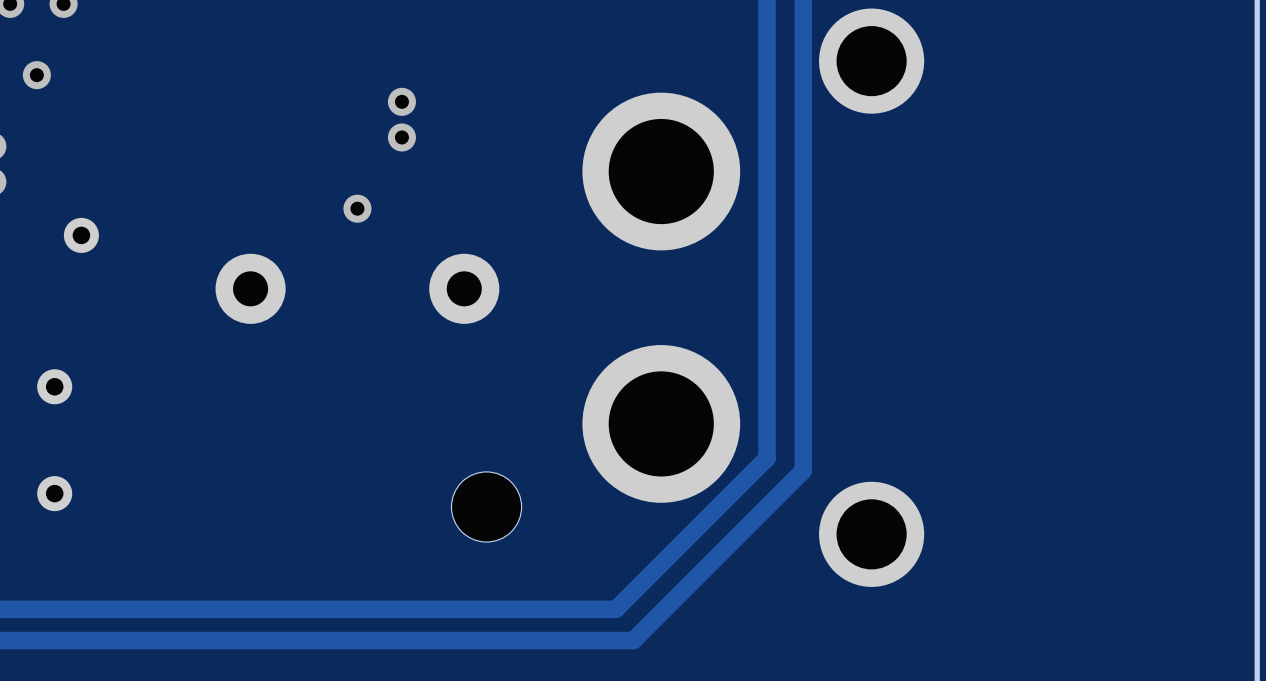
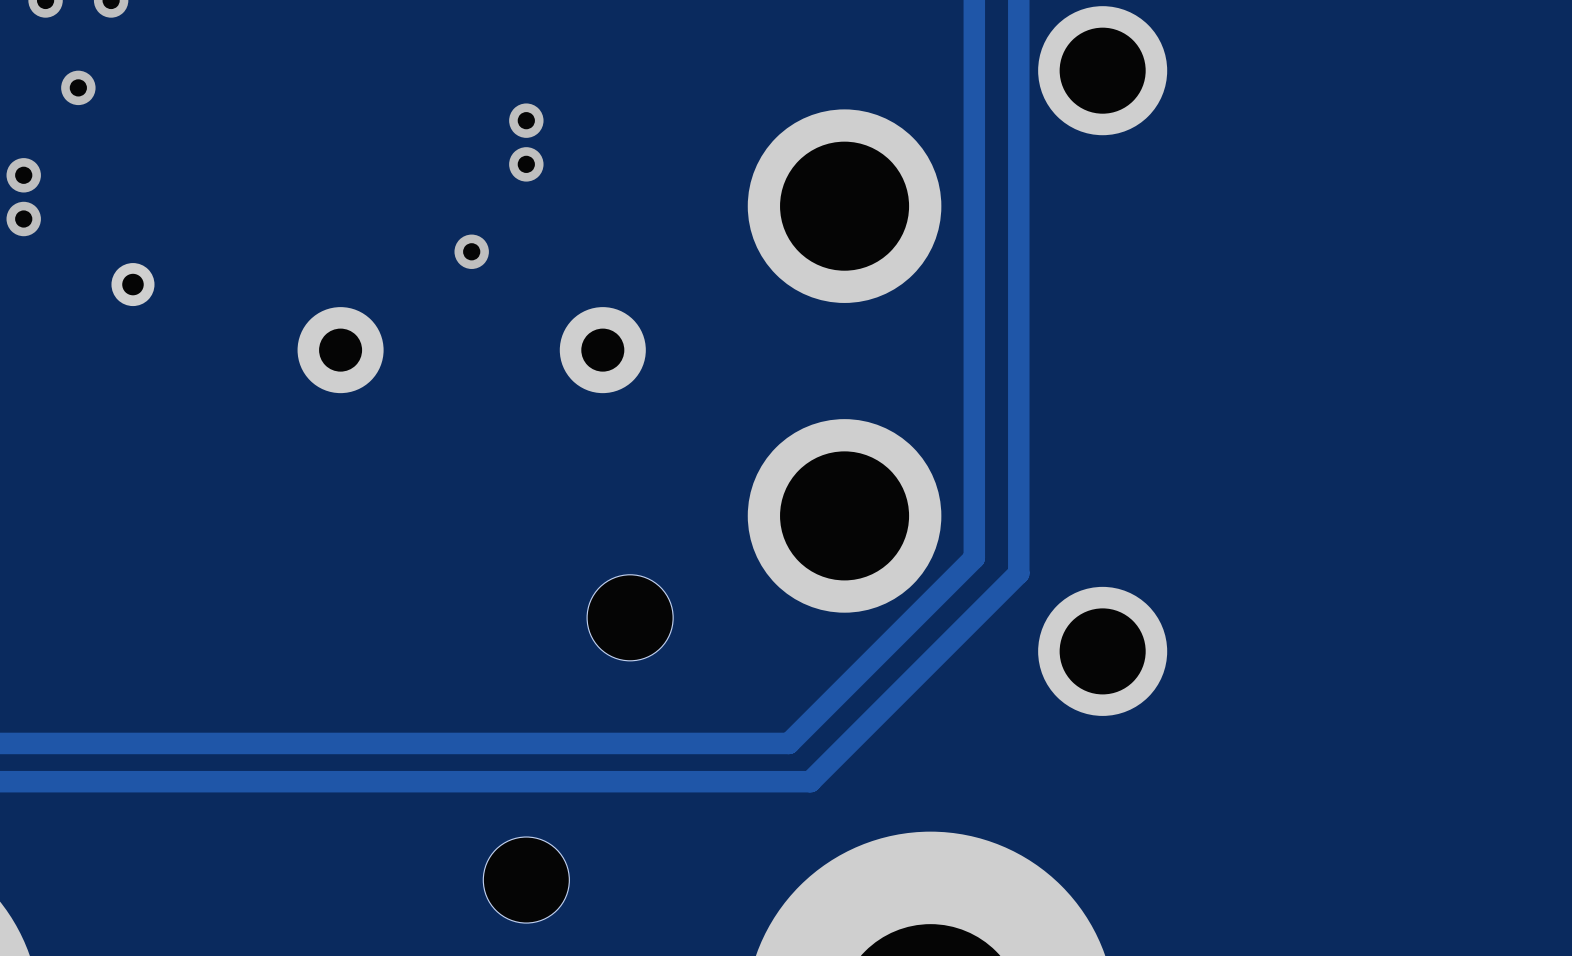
part: (54, 386) -> none
part: (54, 493) -> none

